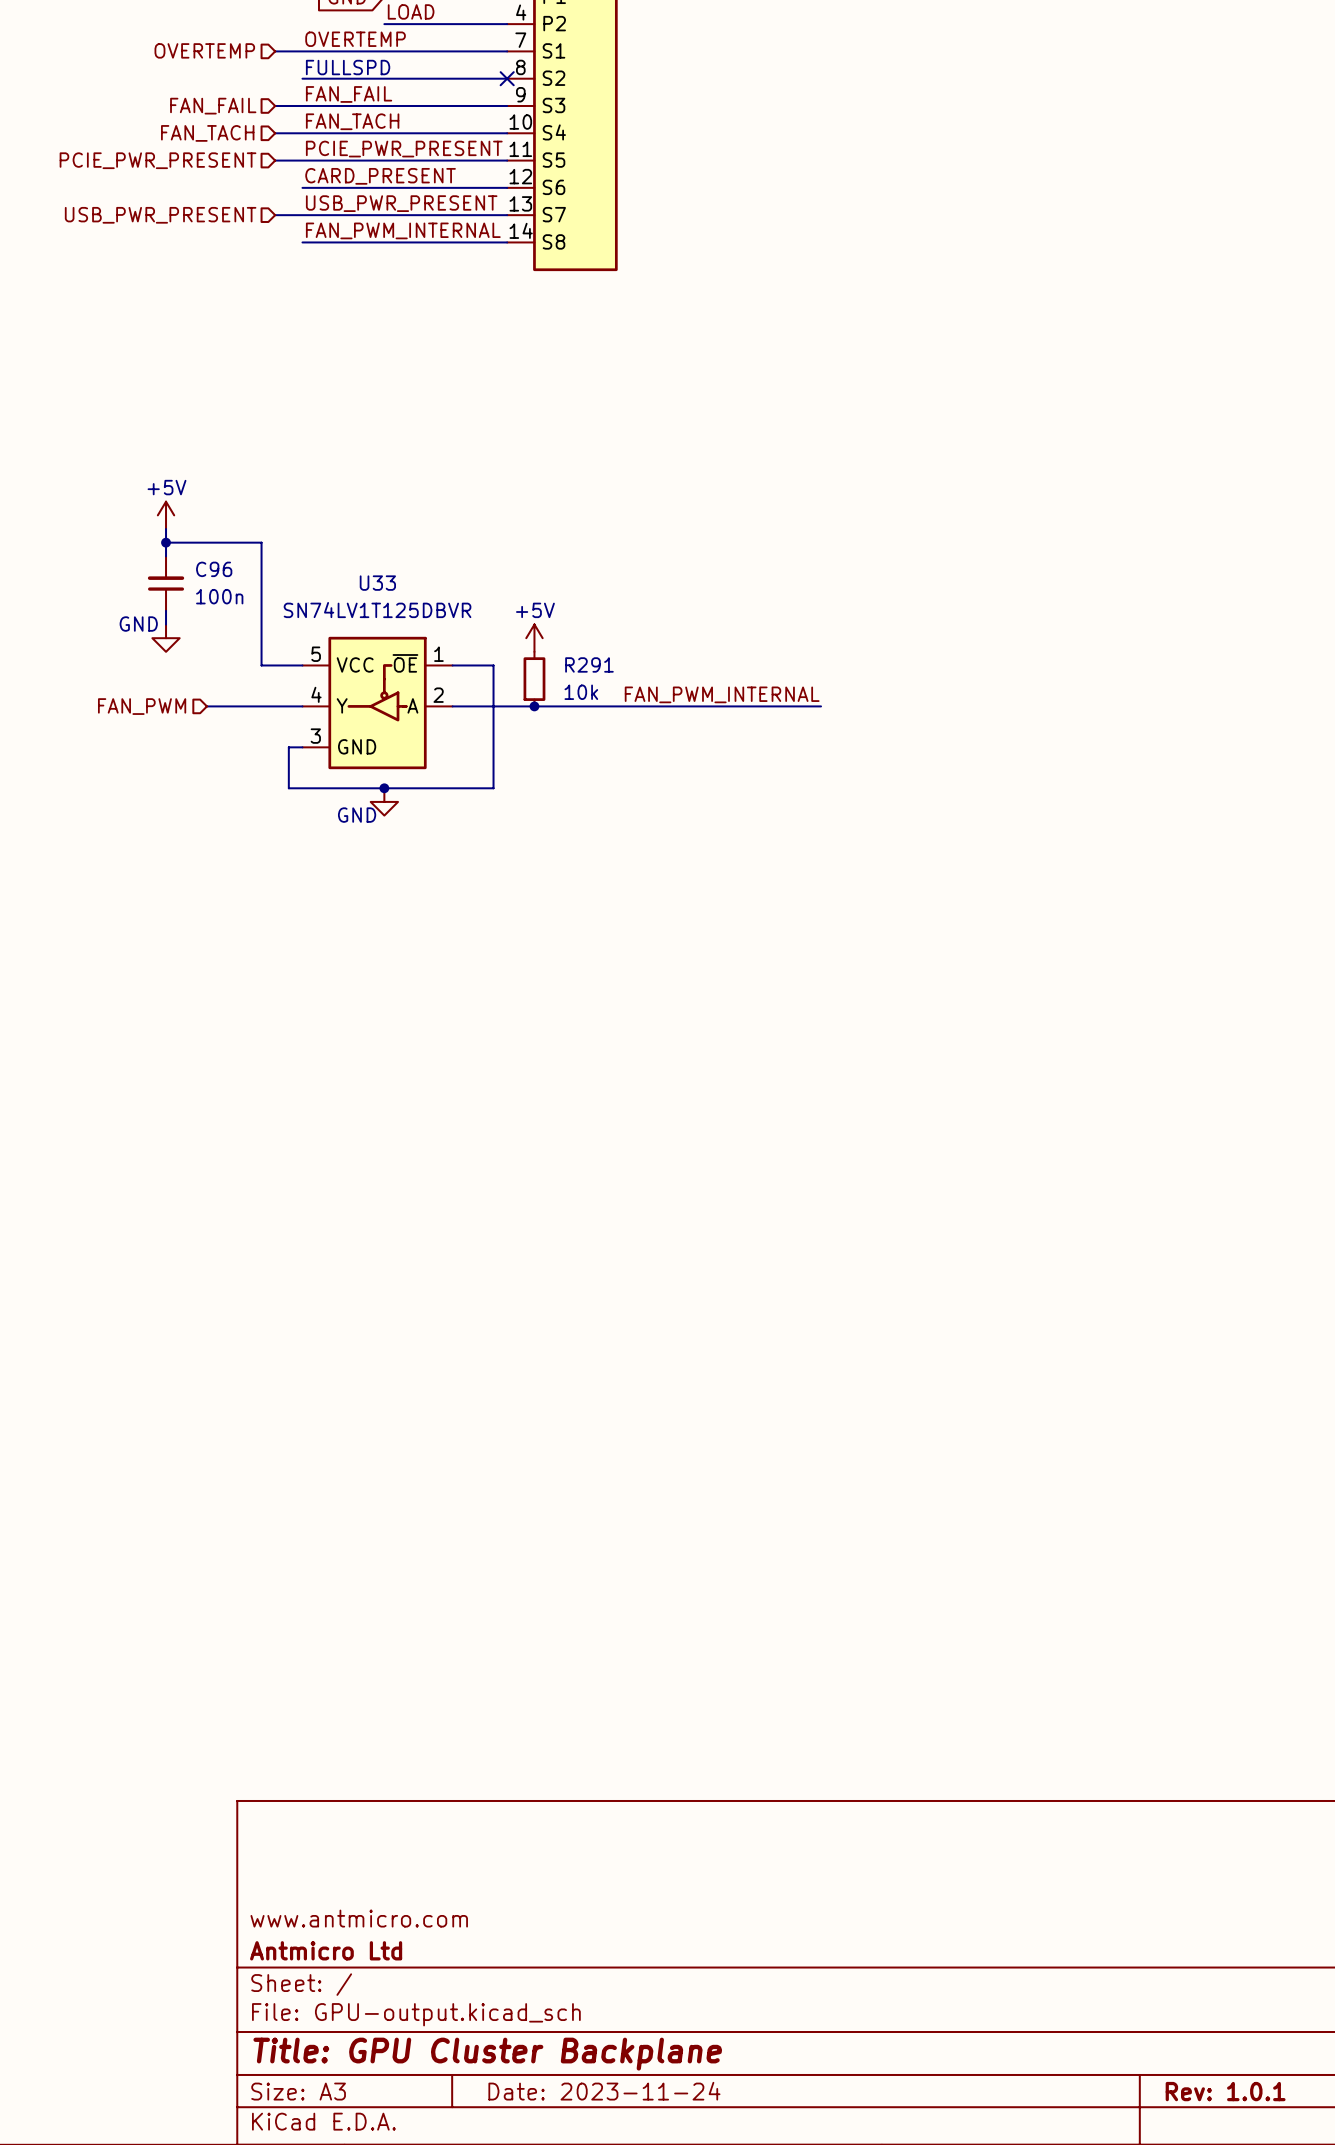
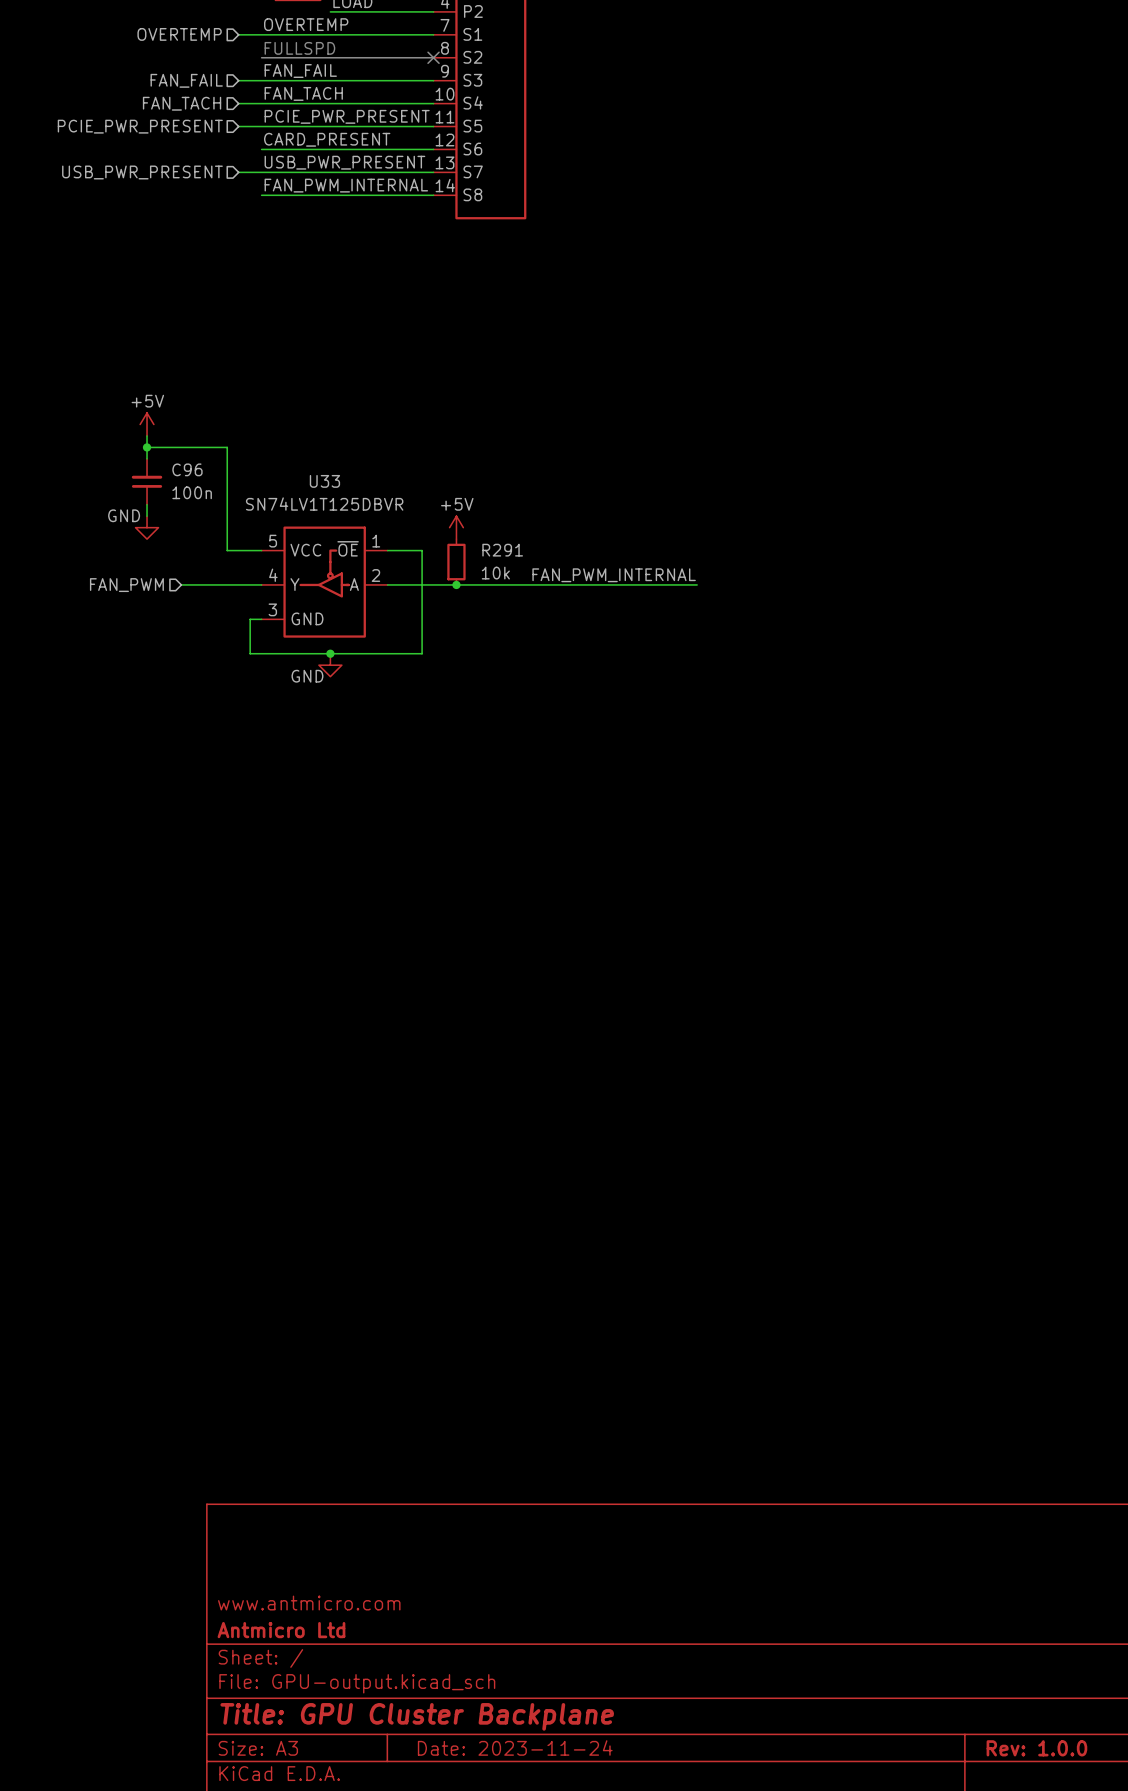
title block: Rev: 1.0.1 (1225, 2091) -> Rev: 1.0.0 (1036, 1748)

